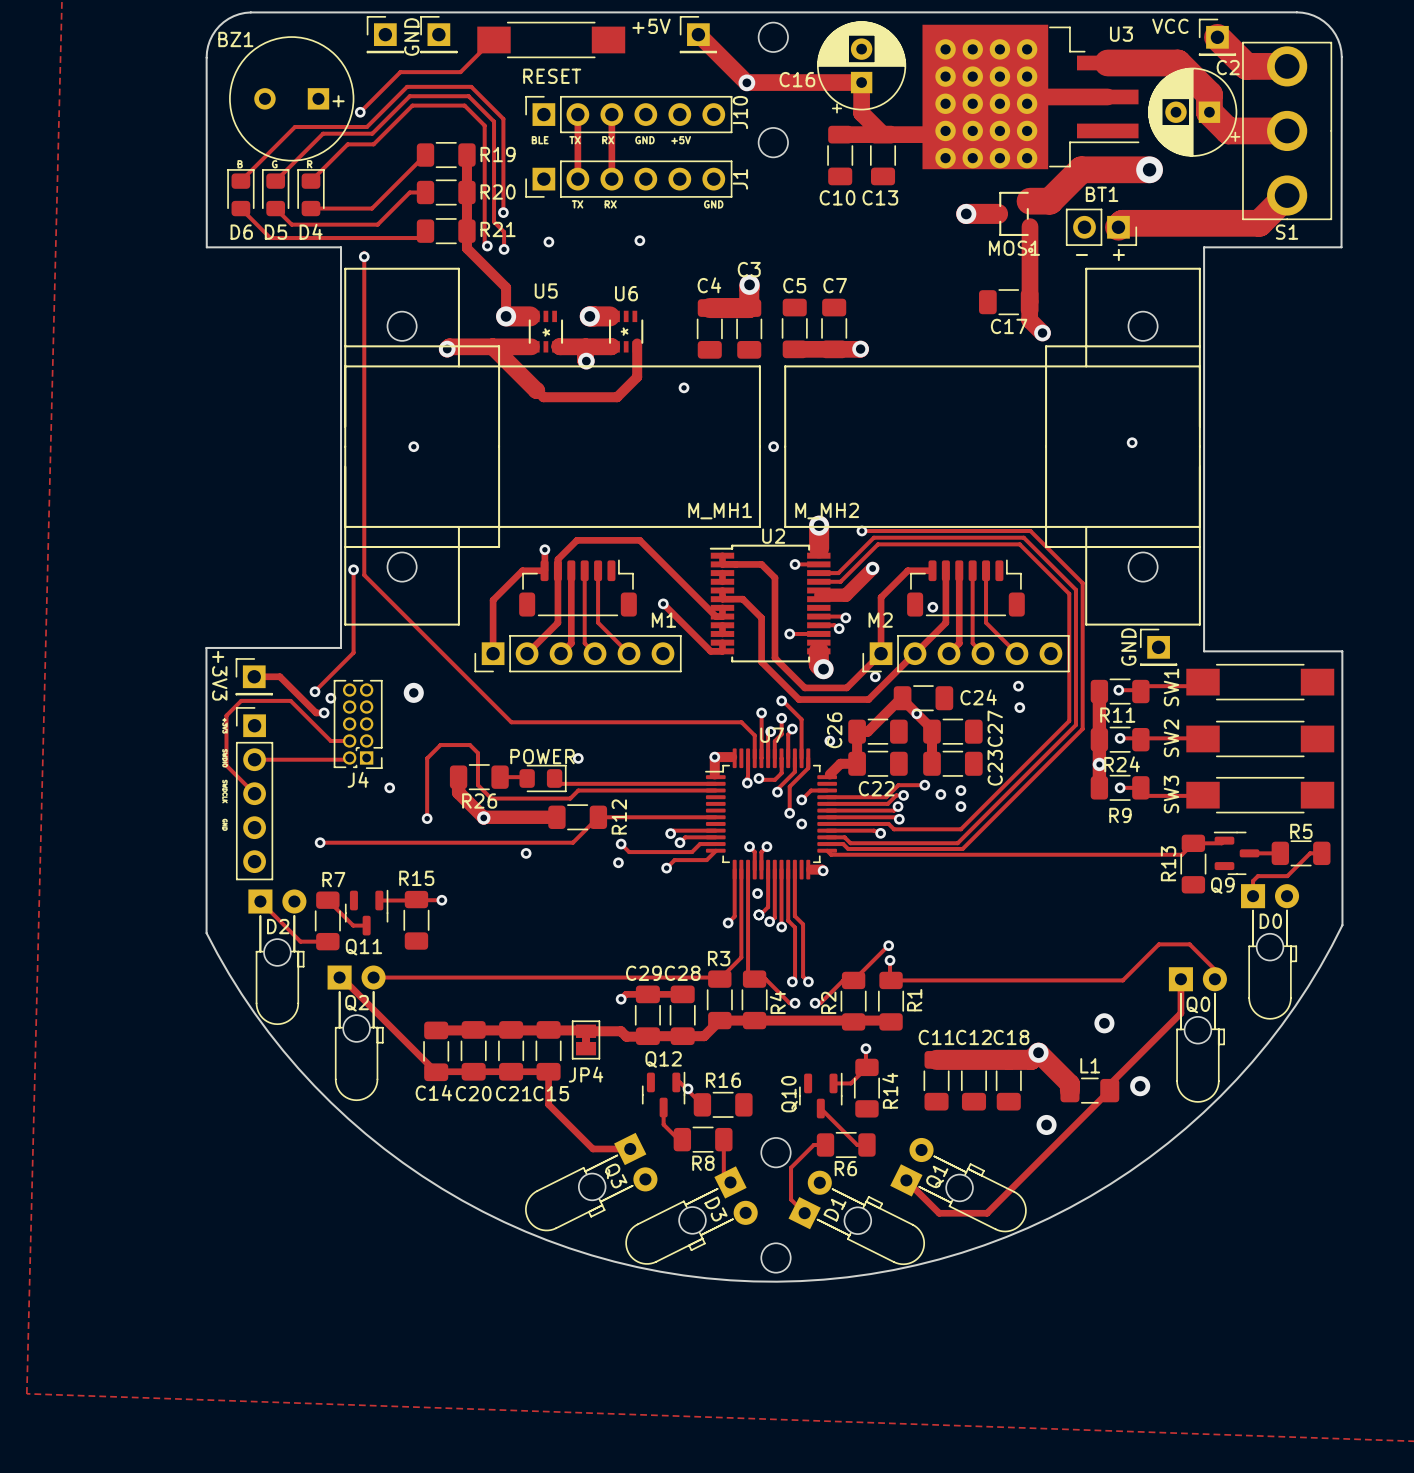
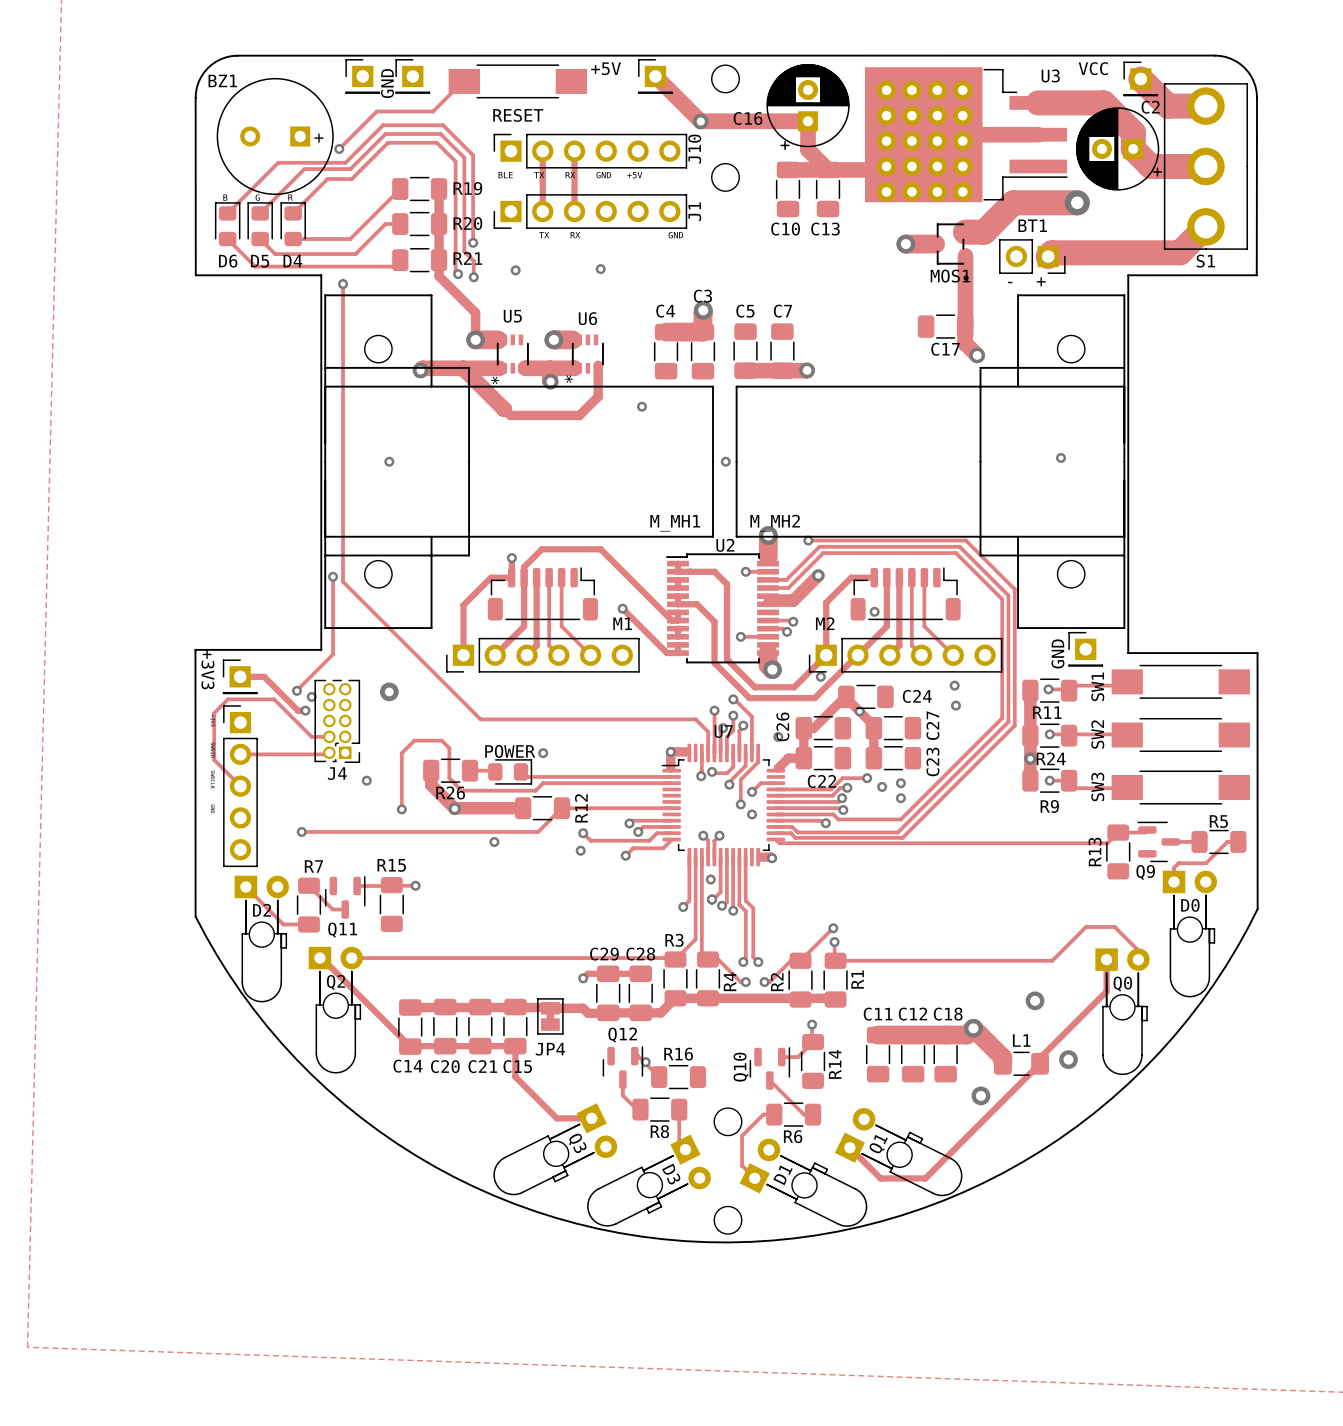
U6 text position: * (624, 331) -> * (568, 379)
U5 text position: * (546, 332) -> * (495, 380)

